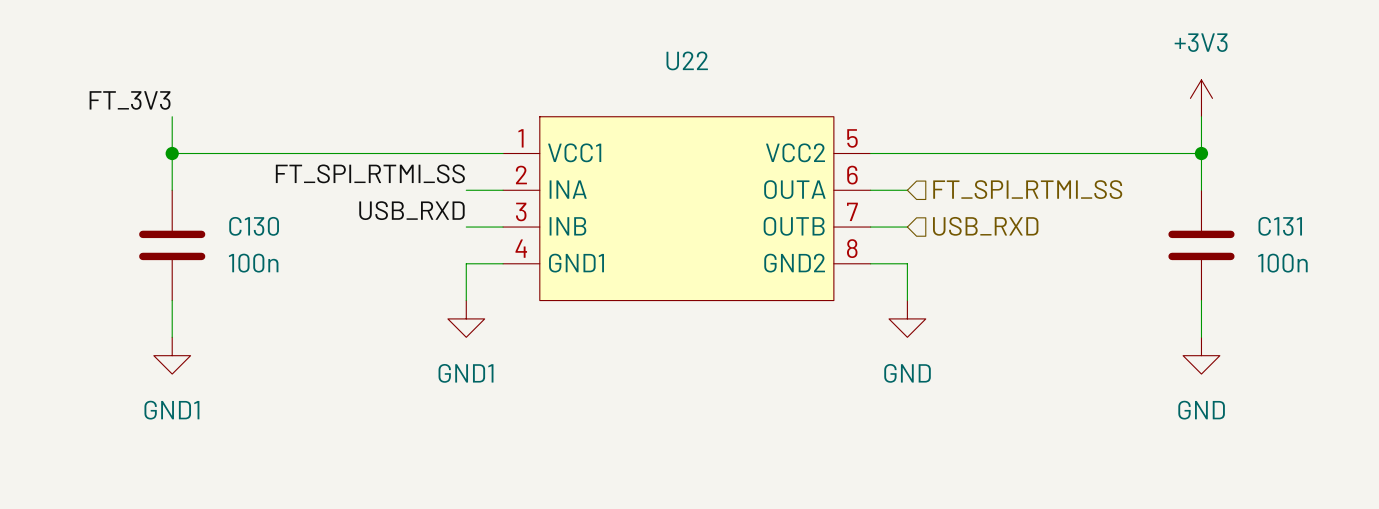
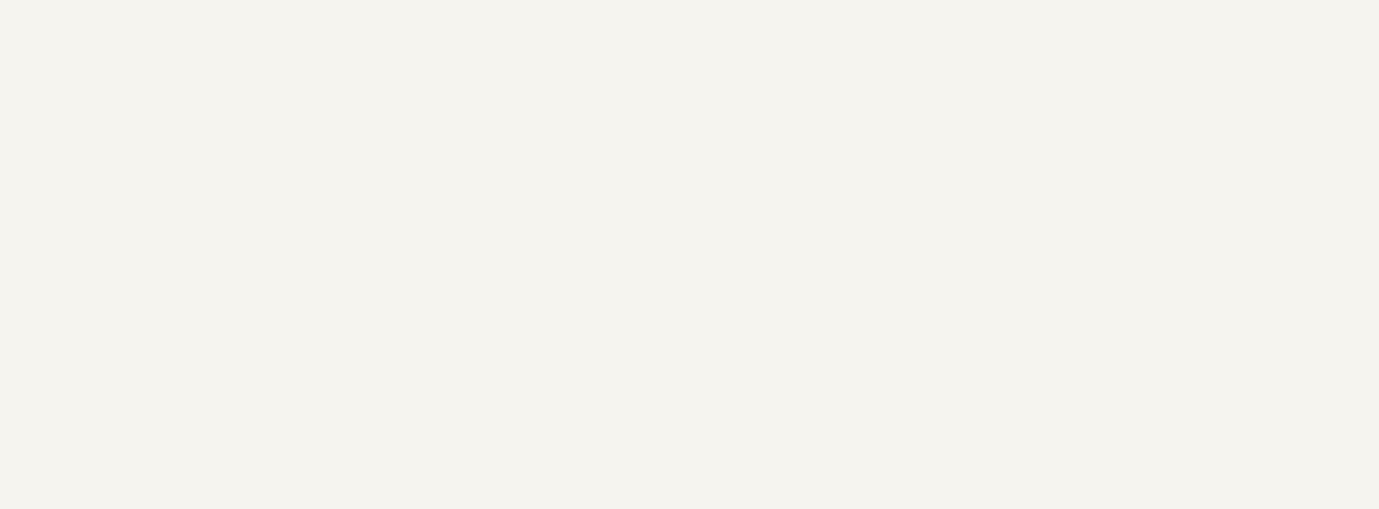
power symbol: +3V3 (1201, 98) -> none
label: FT_3V3 (130, 100) -> none
wire: (172, 116) (172, 190) -> none
wire: (1201, 116) (1201, 190) -> none
wire: (172, 153) (503, 153) -> none
junction: (172, 153) -> none
wire: (870, 153) (1201, 153) -> none
junction: (1201, 153) -> none
label: FT_SPI_RTMI_SS (370, 173) -> none
hierarchical label: FT_SPI_RTMI_SS (1027, 189) -> none
wire: (466, 190) (503, 190) -> none
wire: (870, 190) (907, 190) -> none
U22: (686, 208) -> none
label: USB_RXD (411, 210) -> none
hierarchical label: USB_RXD (985, 226) -> none
wire: (466, 227) (503, 227) -> none
wire: (870, 227) (907, 227) -> none
C130: 100n (172, 245) -> none
C131: 100n (1201, 245) -> none
wire: (503, 263) (466, 263) (466, 300) -> none
wire: (870, 263) (907, 263) (907, 300) -> none
wire: (172, 300) (172, 337) -> none
wire: (1201, 300) (1201, 337) -> none
power symbol: GND1 (466, 318) -> none
power symbol: GND (907, 318) -> none
power symbol: GND1 (172, 355) -> none
power symbol: GND (1201, 355) -> none

